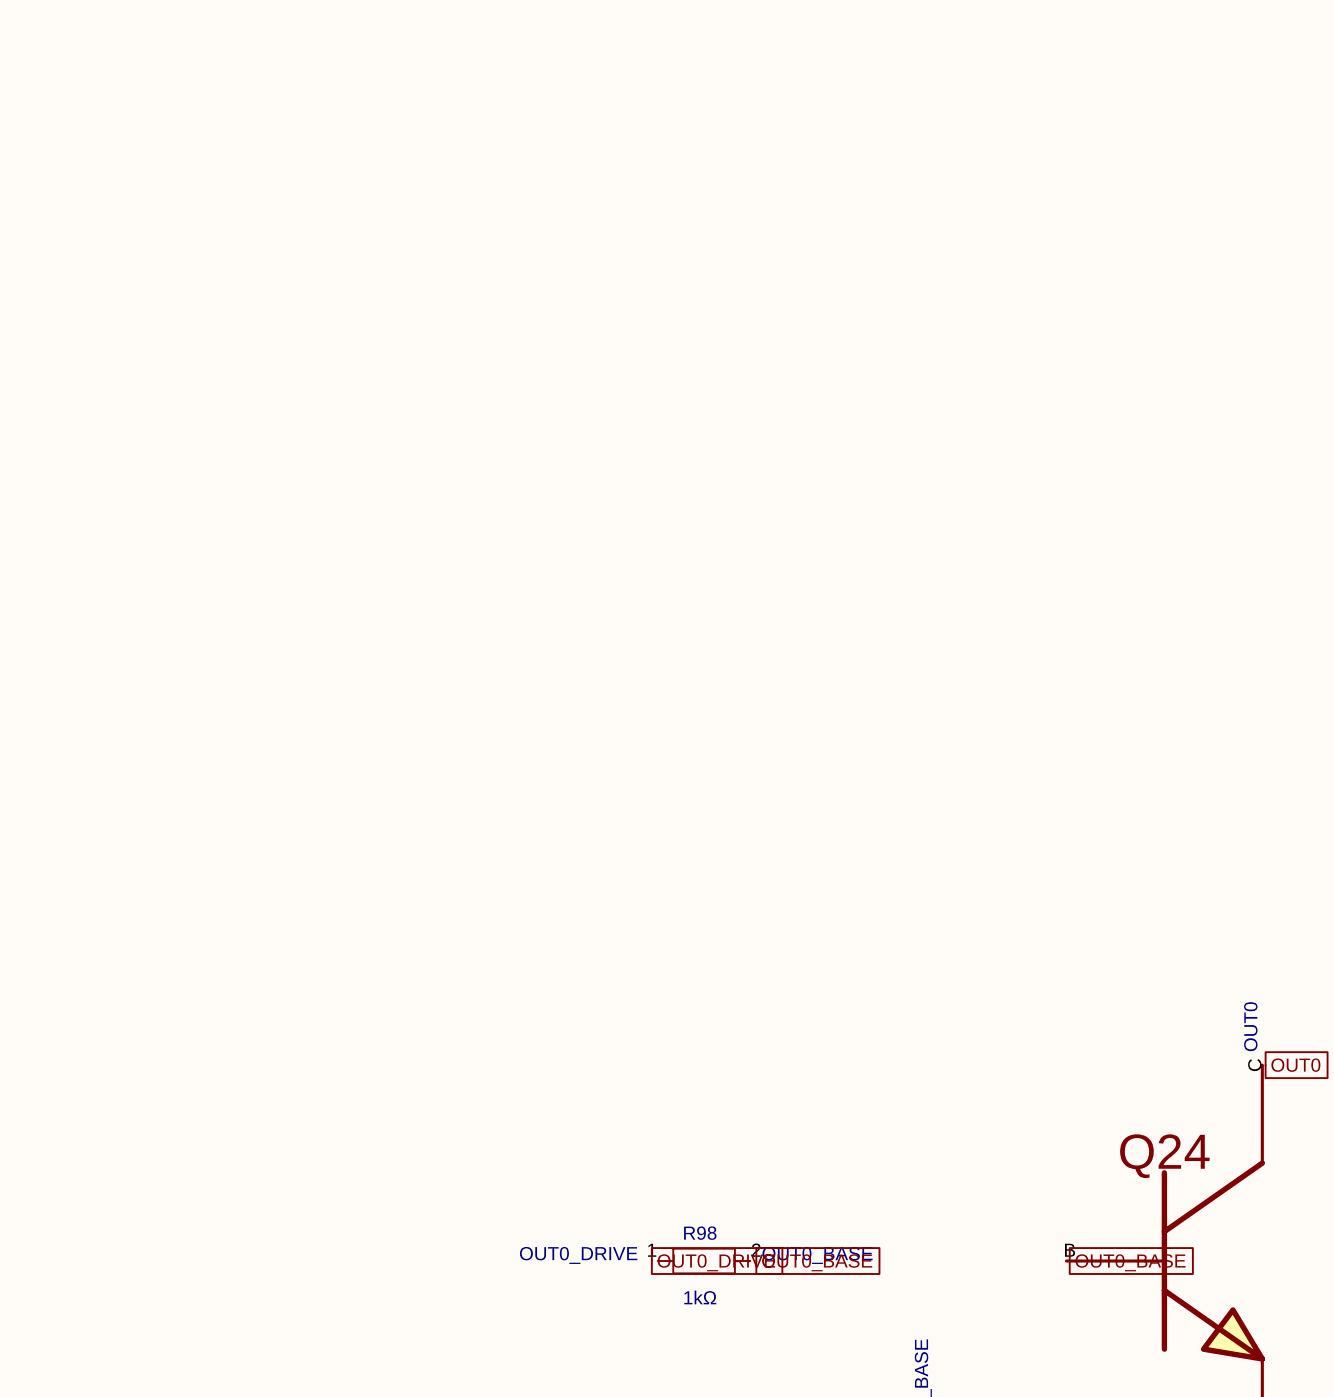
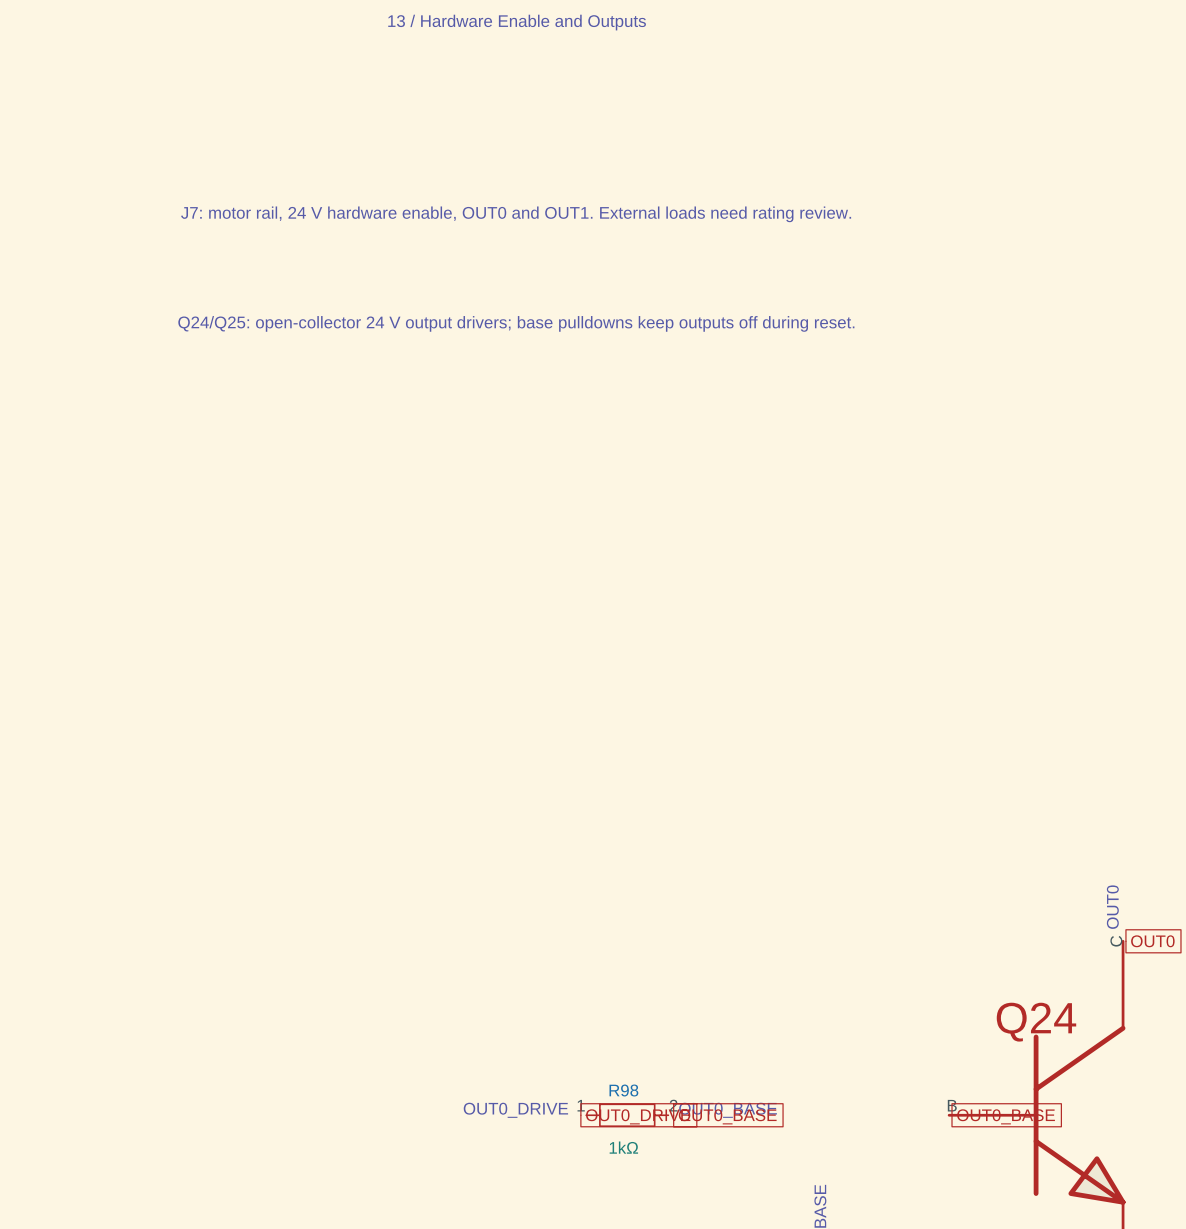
text: none -> 13 / Hardware Enable and Outputs (517, 22)
text: none -> J7: motor rail, 24 V hardware enable, OUT0 and OUT1. External loads need rating review. (516, 214)
text: none -> Q24/Q25: open-collector 24 V output drivers; base pulldowns keep outputs off during reset. (516, 323)

